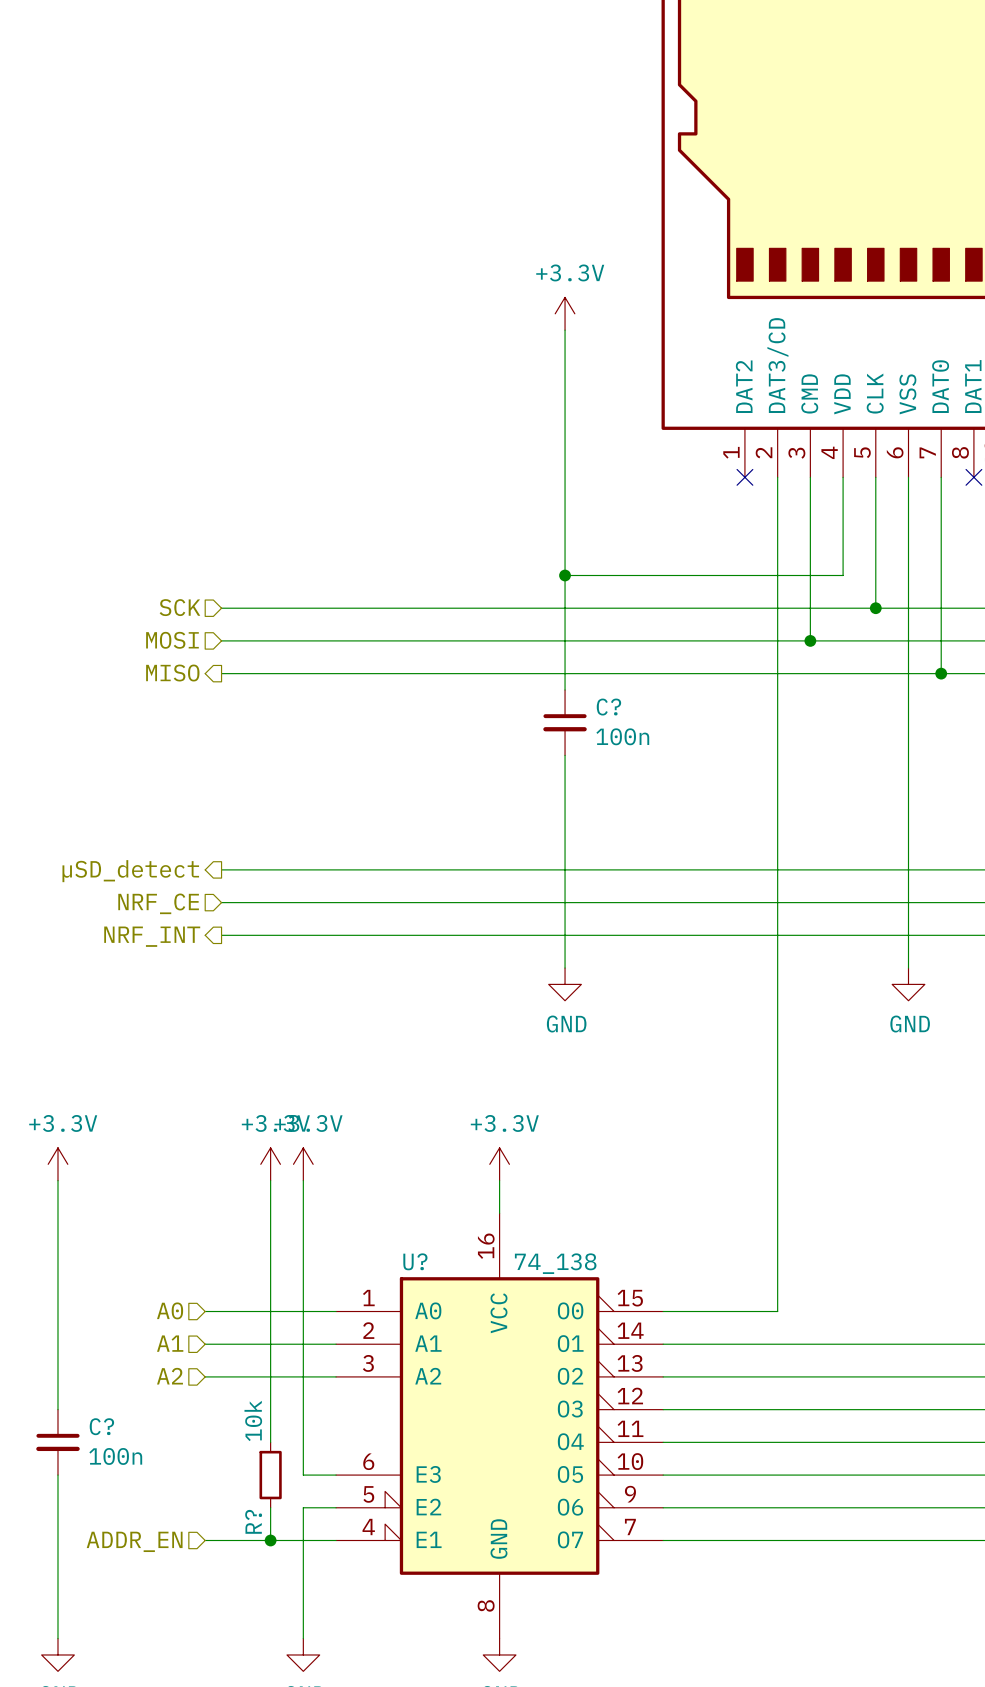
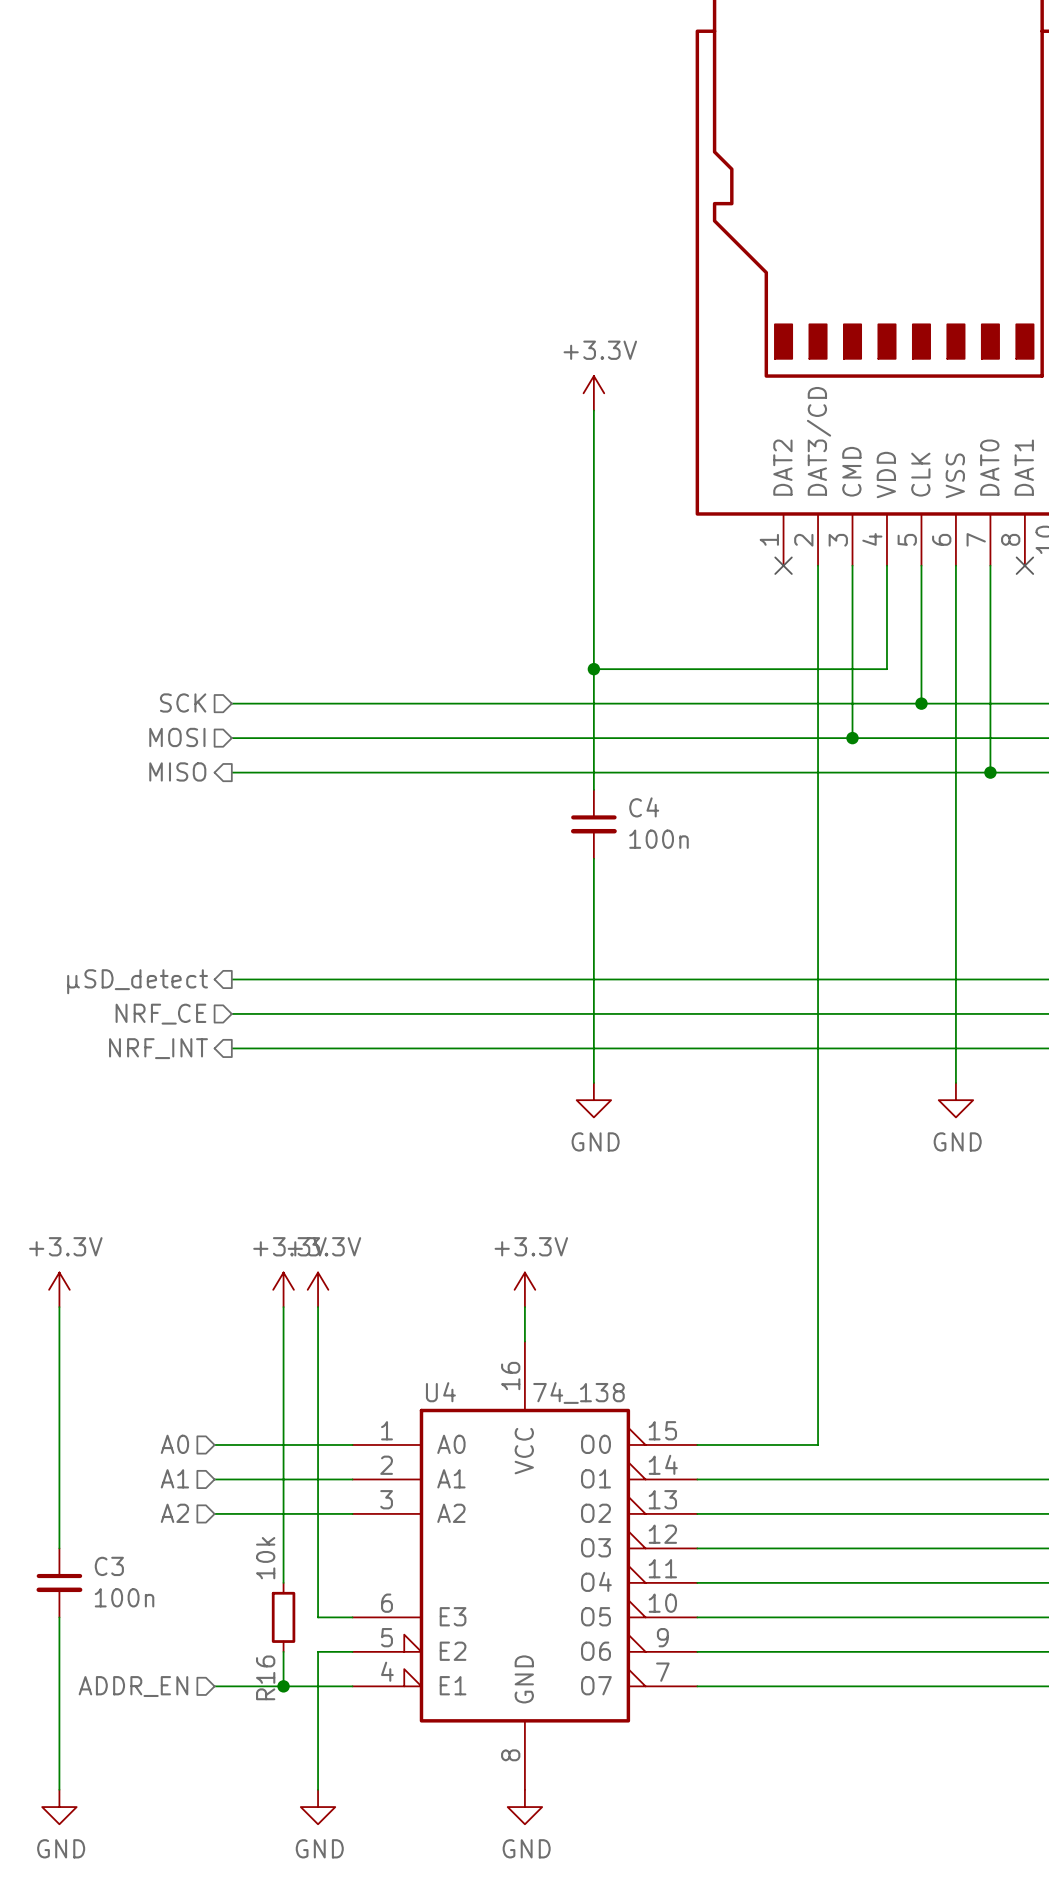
C? name: C? (608, 707) -> C4 (644, 807)
U? name: U? (415, 1261) -> U4 (440, 1392)
C? name: C? (101, 1426) -> C3 (109, 1566)
R? name: R? (253, 1521) -> R16 (265, 1677)

